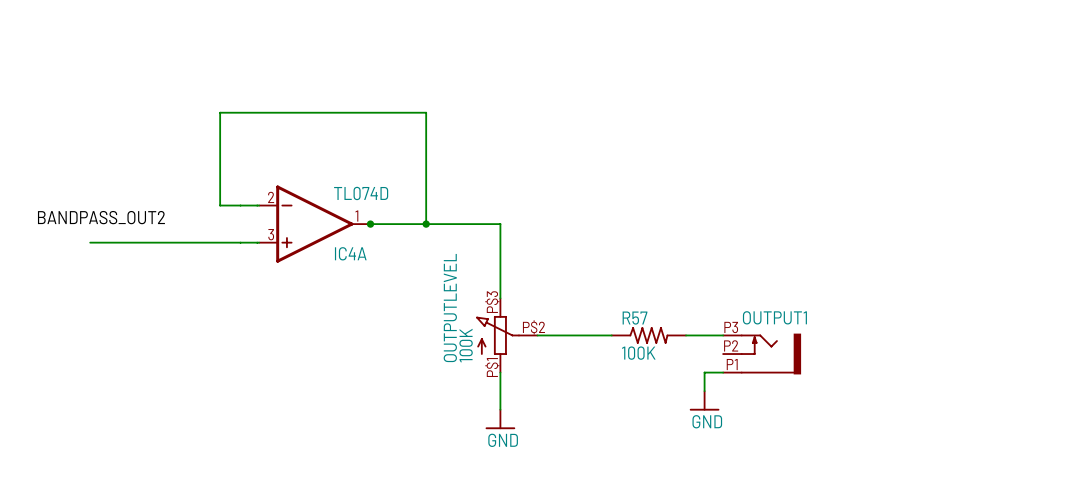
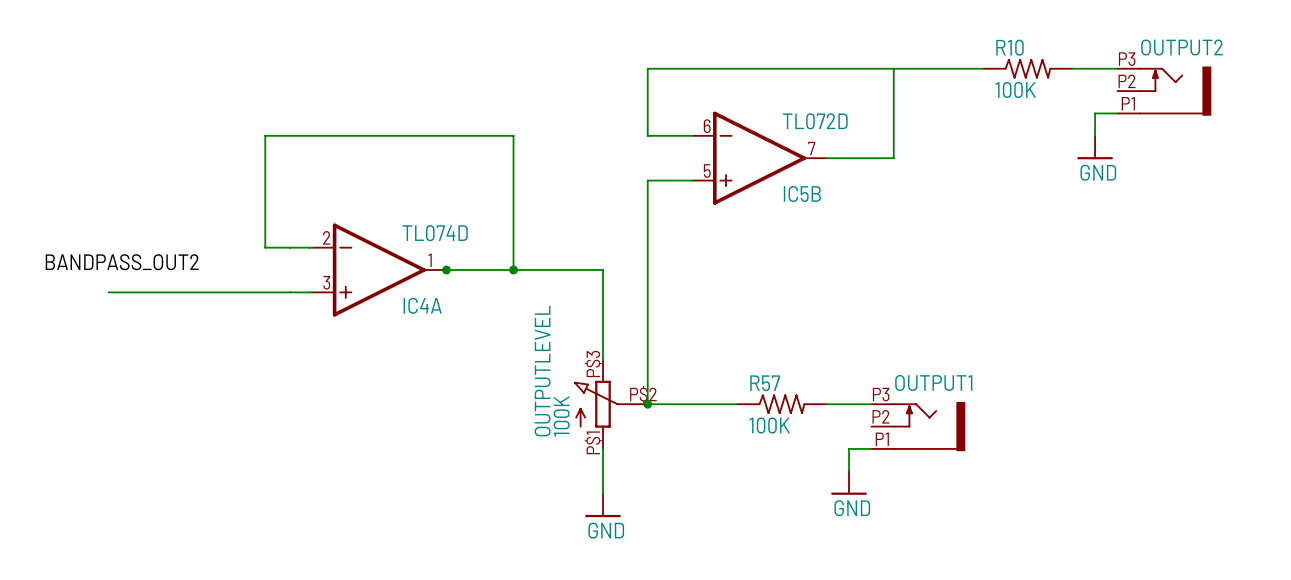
wire: none -> (893, 68) (893, 158) (826, 158)
wire: none -> (983, 68) (647, 68) (647, 135) (692, 135)
R10: none -> 100K (1027, 68)
wire: none -> (1072, 68) (1117, 68)
OUTPUT2: none -> (1164, 91)
wire: none -> (1117, 113) (1095, 113) (1095, 135)
power symbol: none -> GND (1095, 147)
IC5B: none -> TL072D (759, 158)
wire: none -> (692, 180) (647, 180) (647, 404)
junction: none -> (647, 404)

